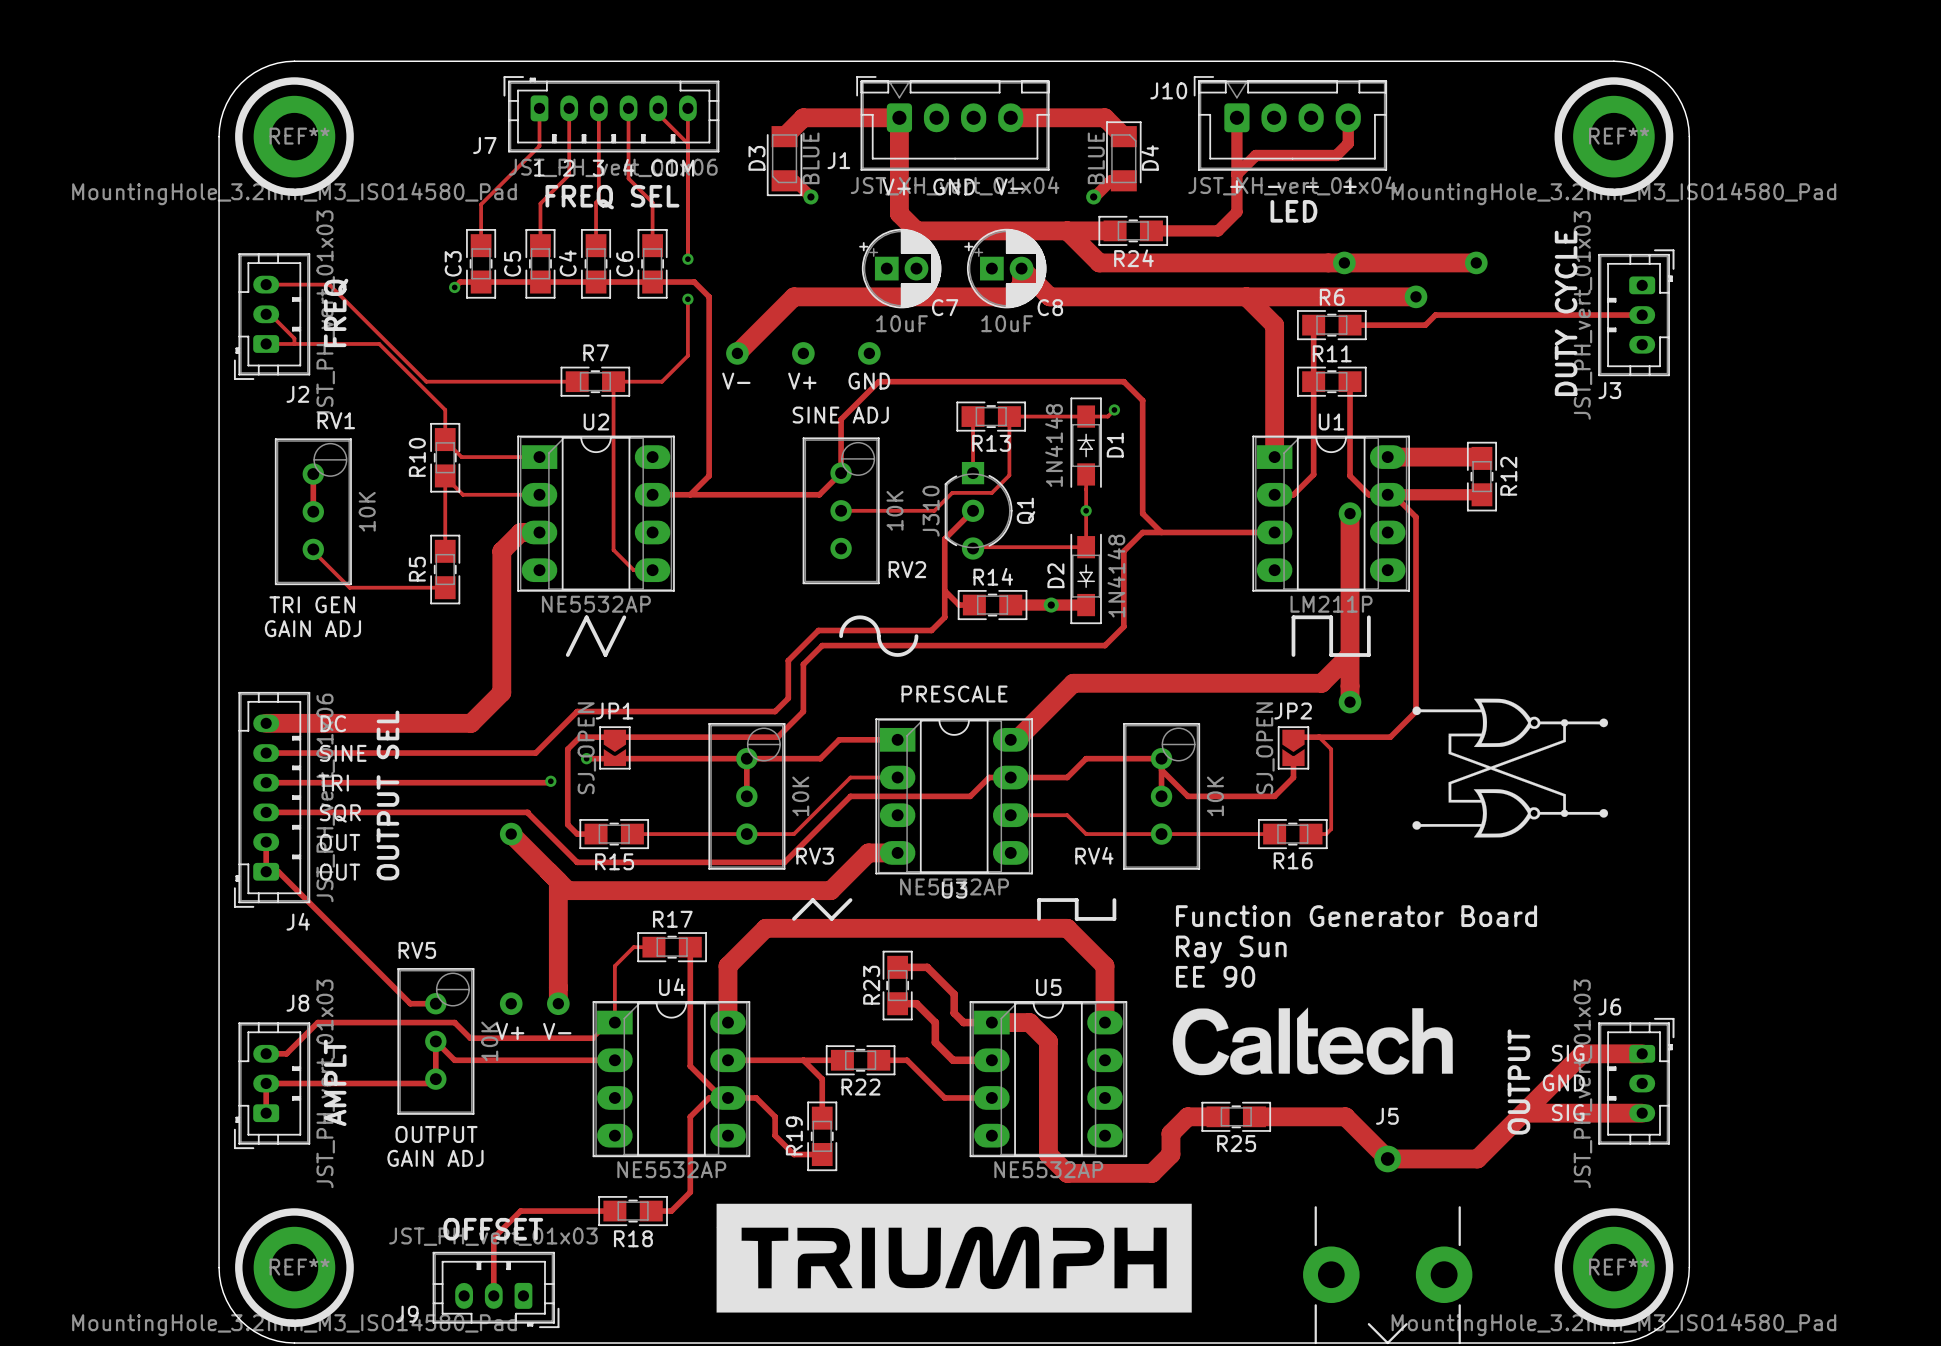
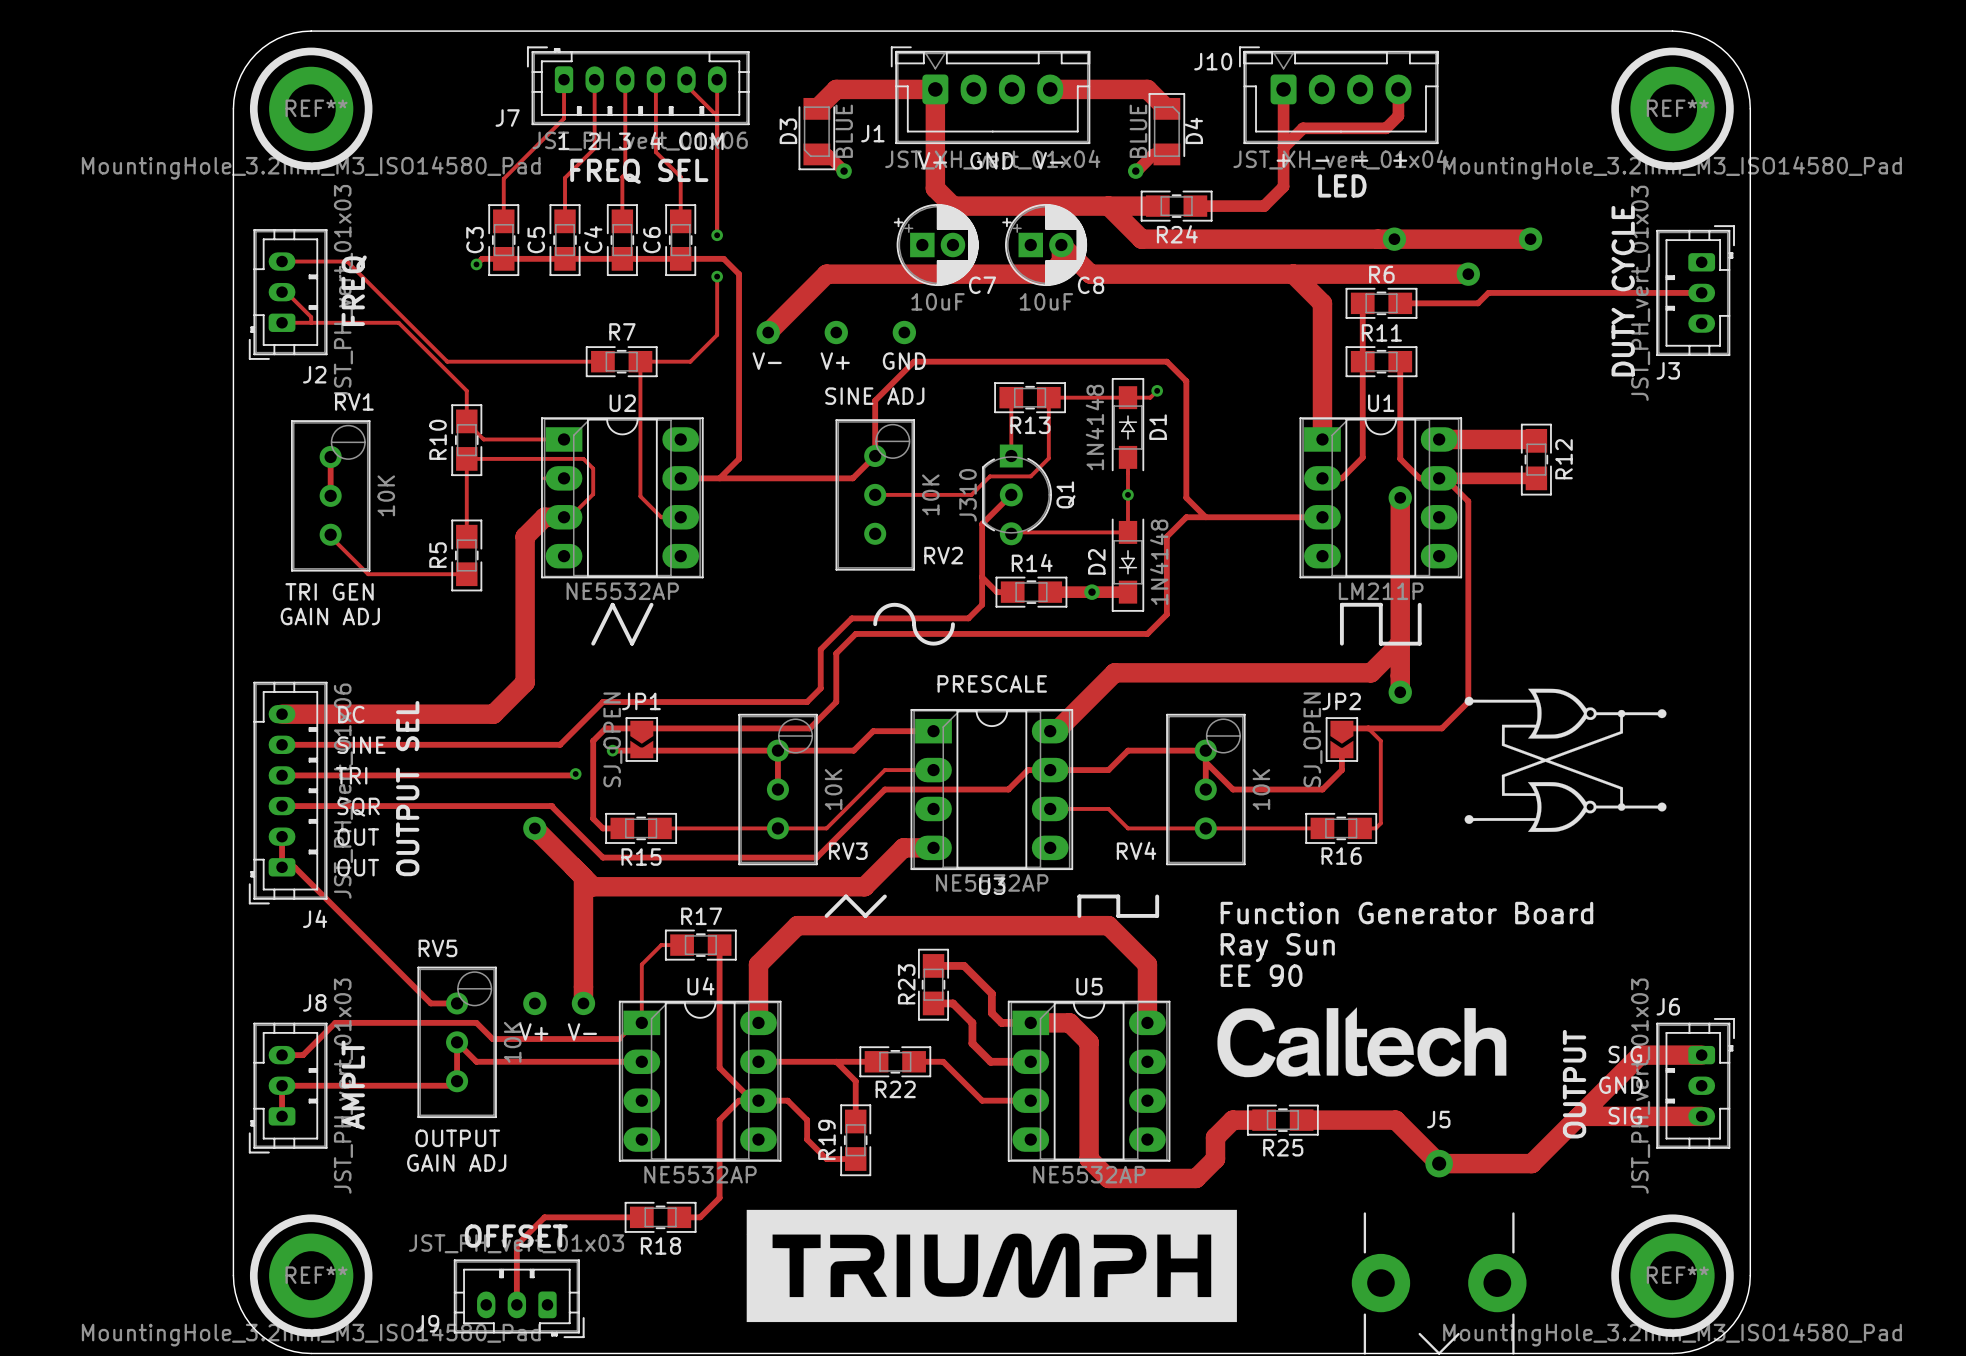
track: none -> (466, 458) (583, 458) (593, 468) (593, 494) (570, 517) (564, 517)
track: (445, 477) (462, 494) (520, 494) -> none
track: (613, 512) (613, 549) (633, 570) (652, 570) -> (640, 496) (661, 517) (680, 517)

